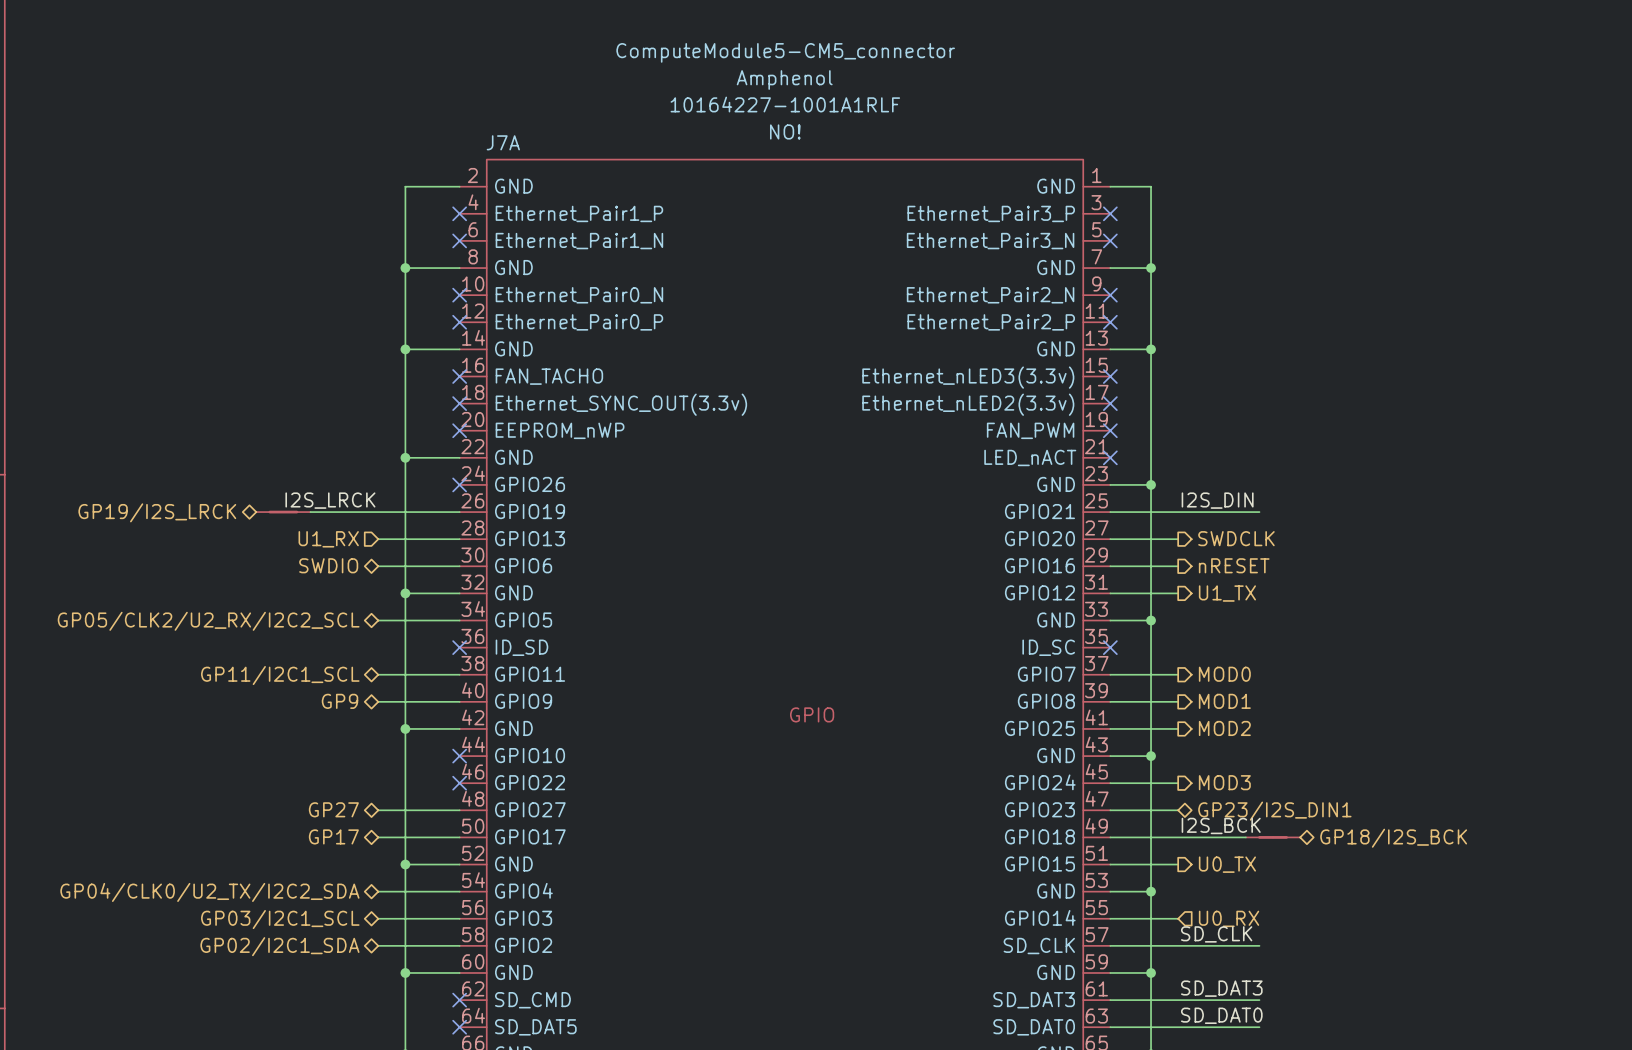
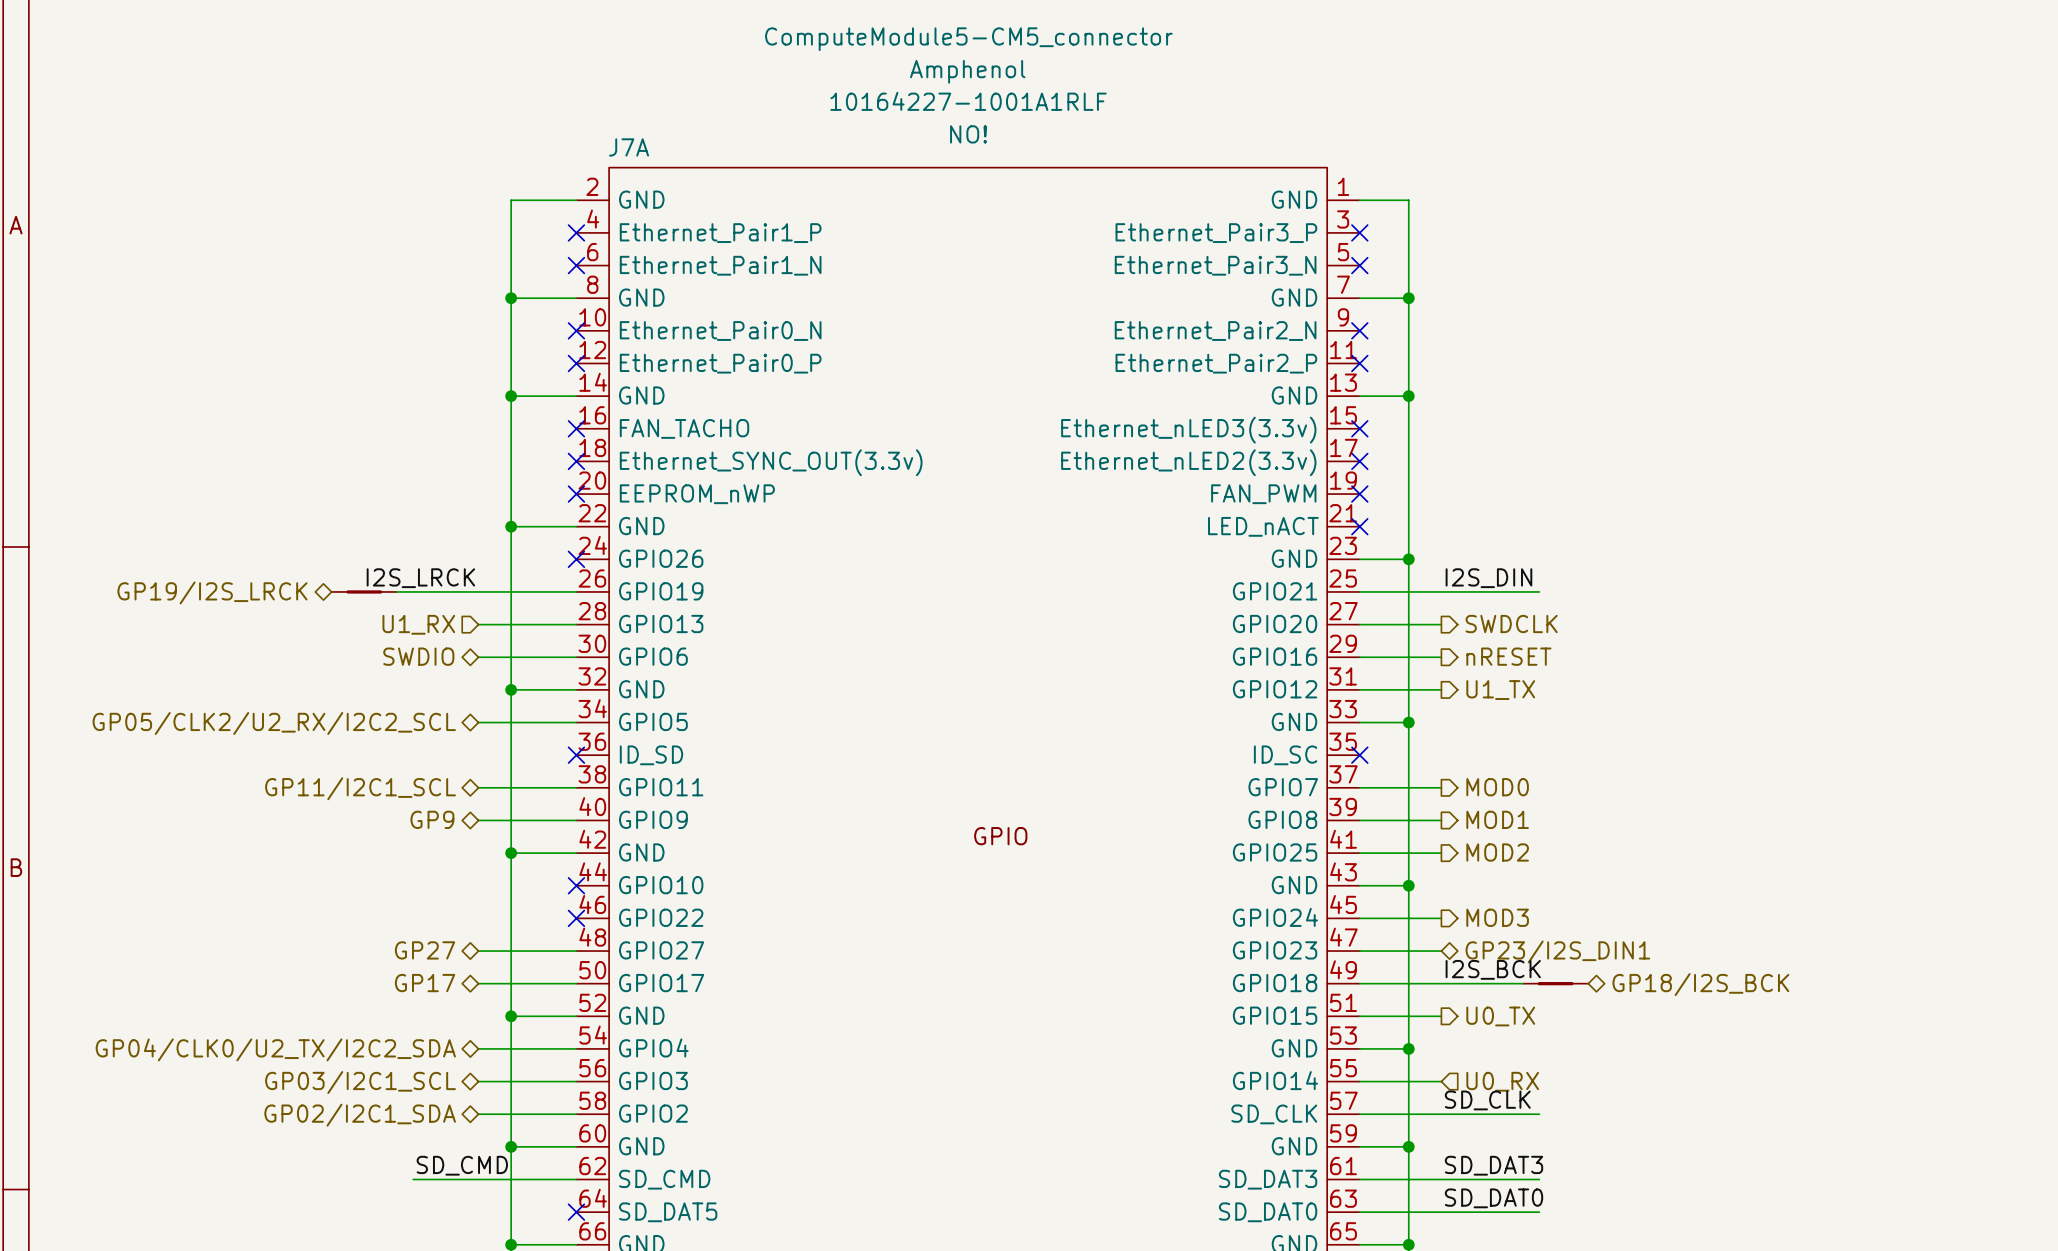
label: none -> SD_CMD (462, 1165)
wire: none -> (413, 1179) (576, 1179)
no-connect mark: (459, 1000) -> none

